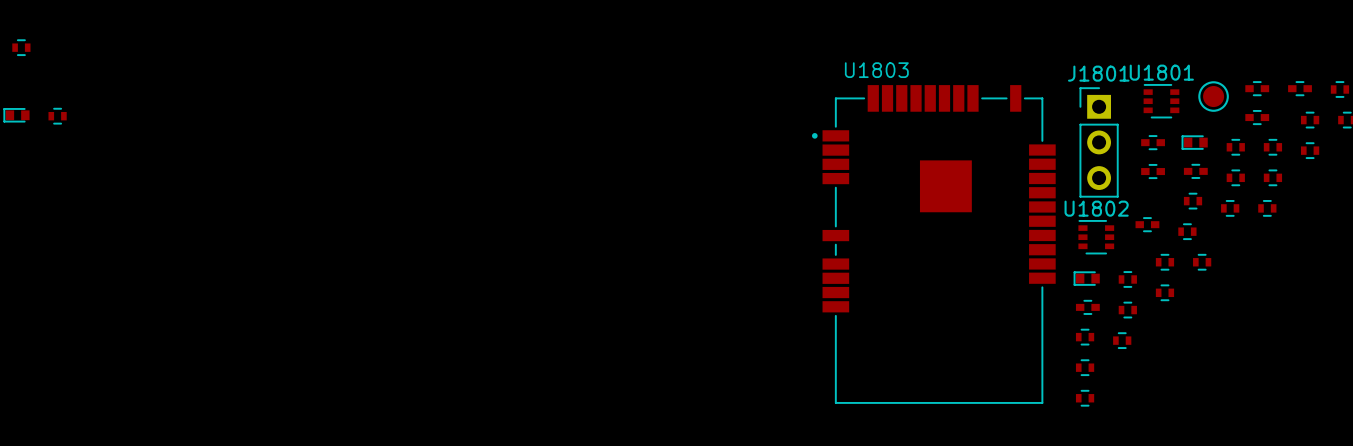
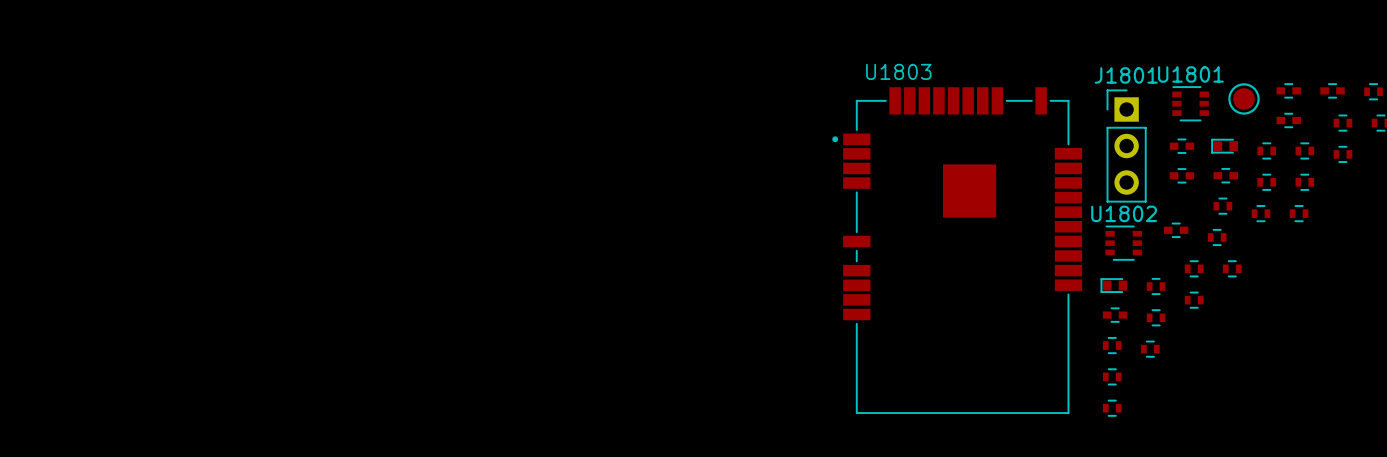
part: (21, 47) -> none
part: (16, 115) -> none
part: (57, 116) -> none

